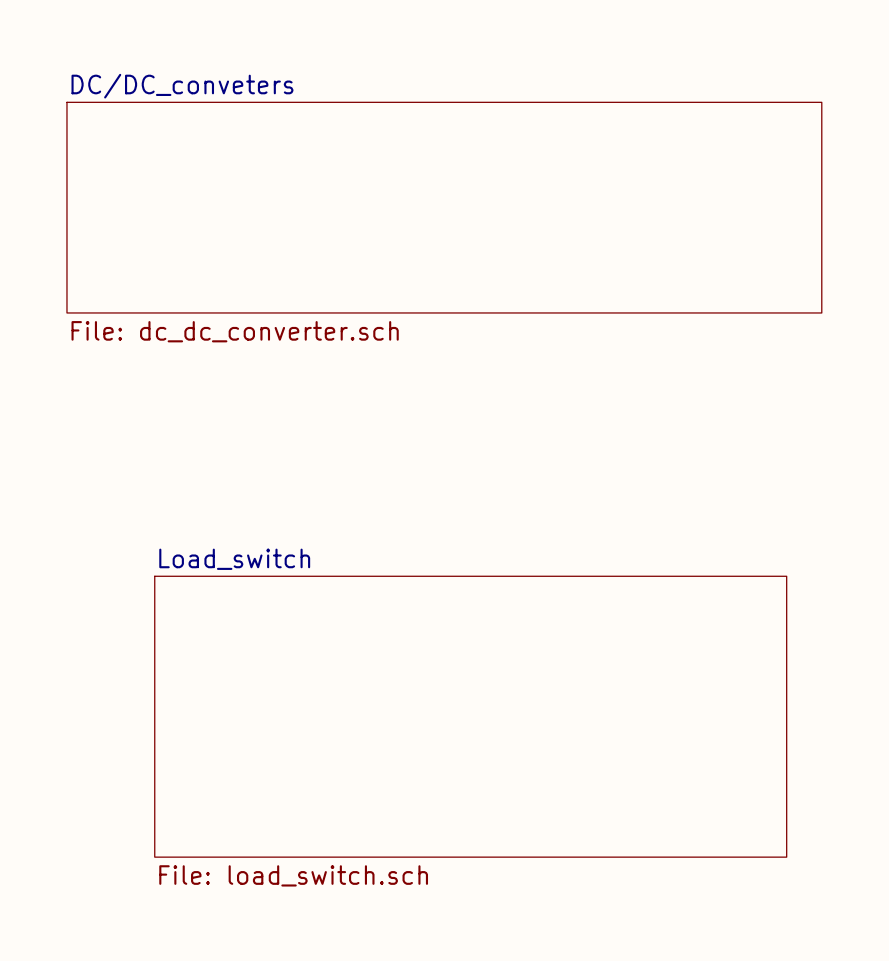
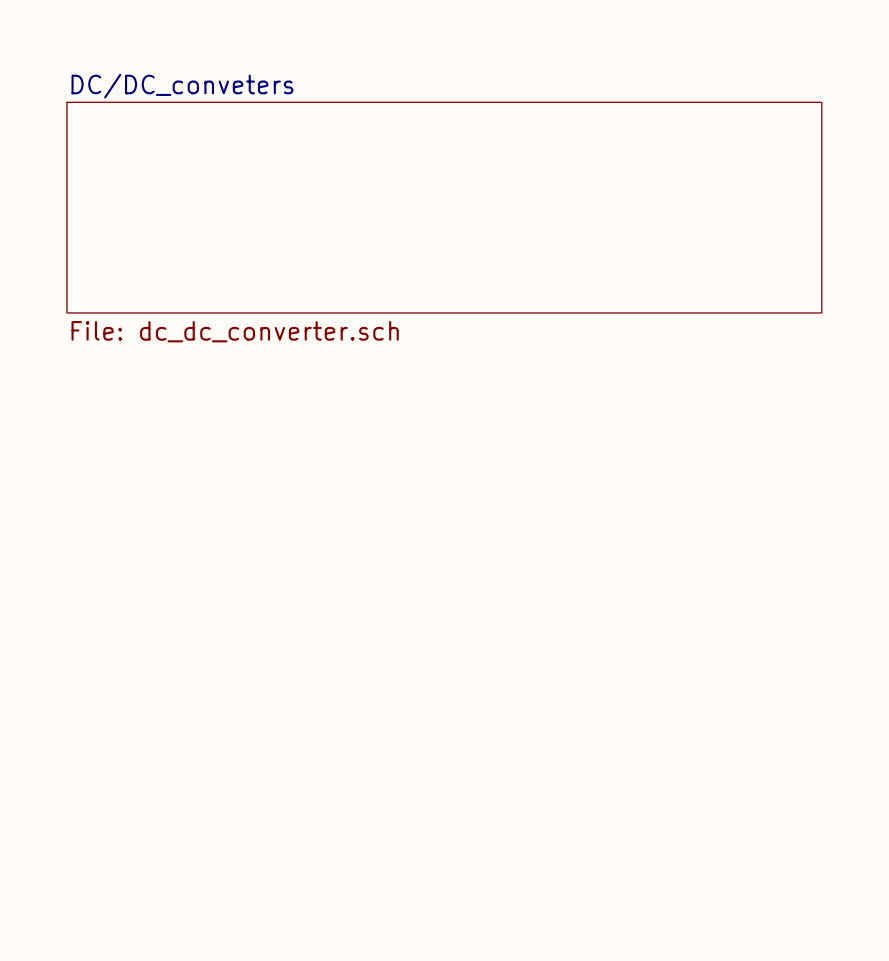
sheet Load_switch: File: load_switch.sch (470, 716) -> none

